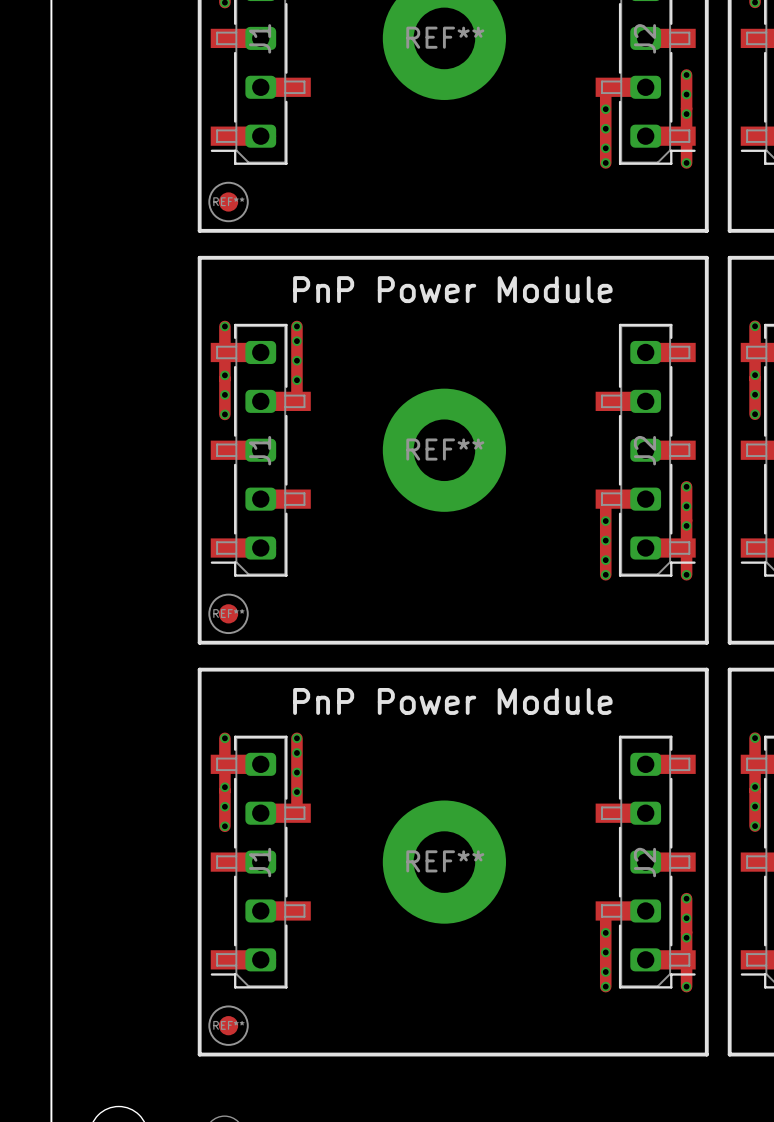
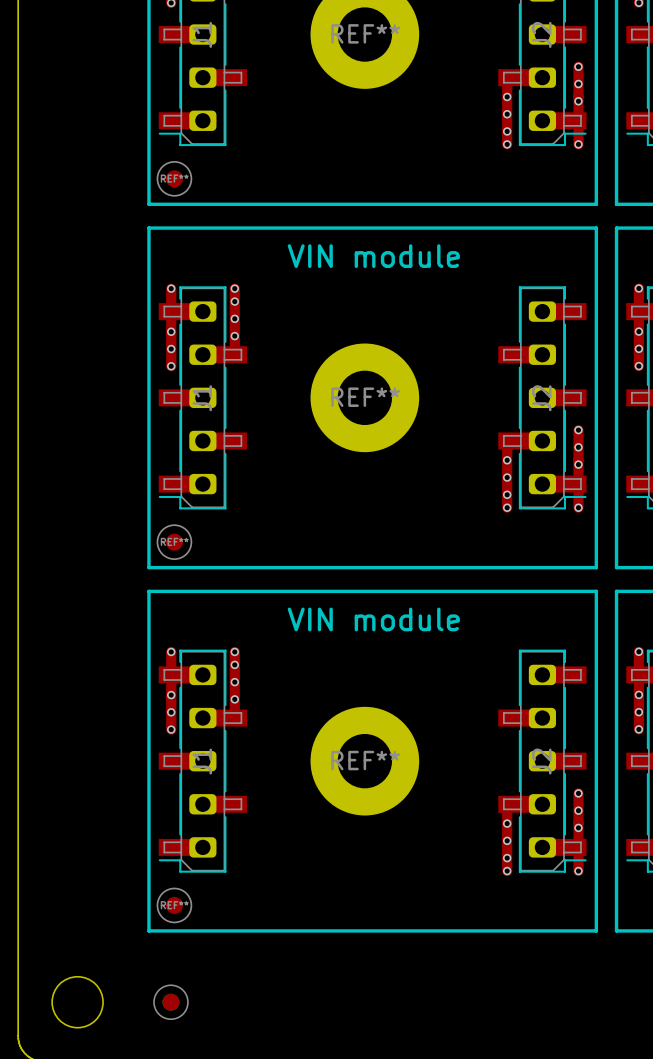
text: PnP Power Module (452, 289) -> none
text: none -> VIN module (373, 256)
text: PnP Power Module (452, 701) -> none
text: none -> VIN module (373, 619)

